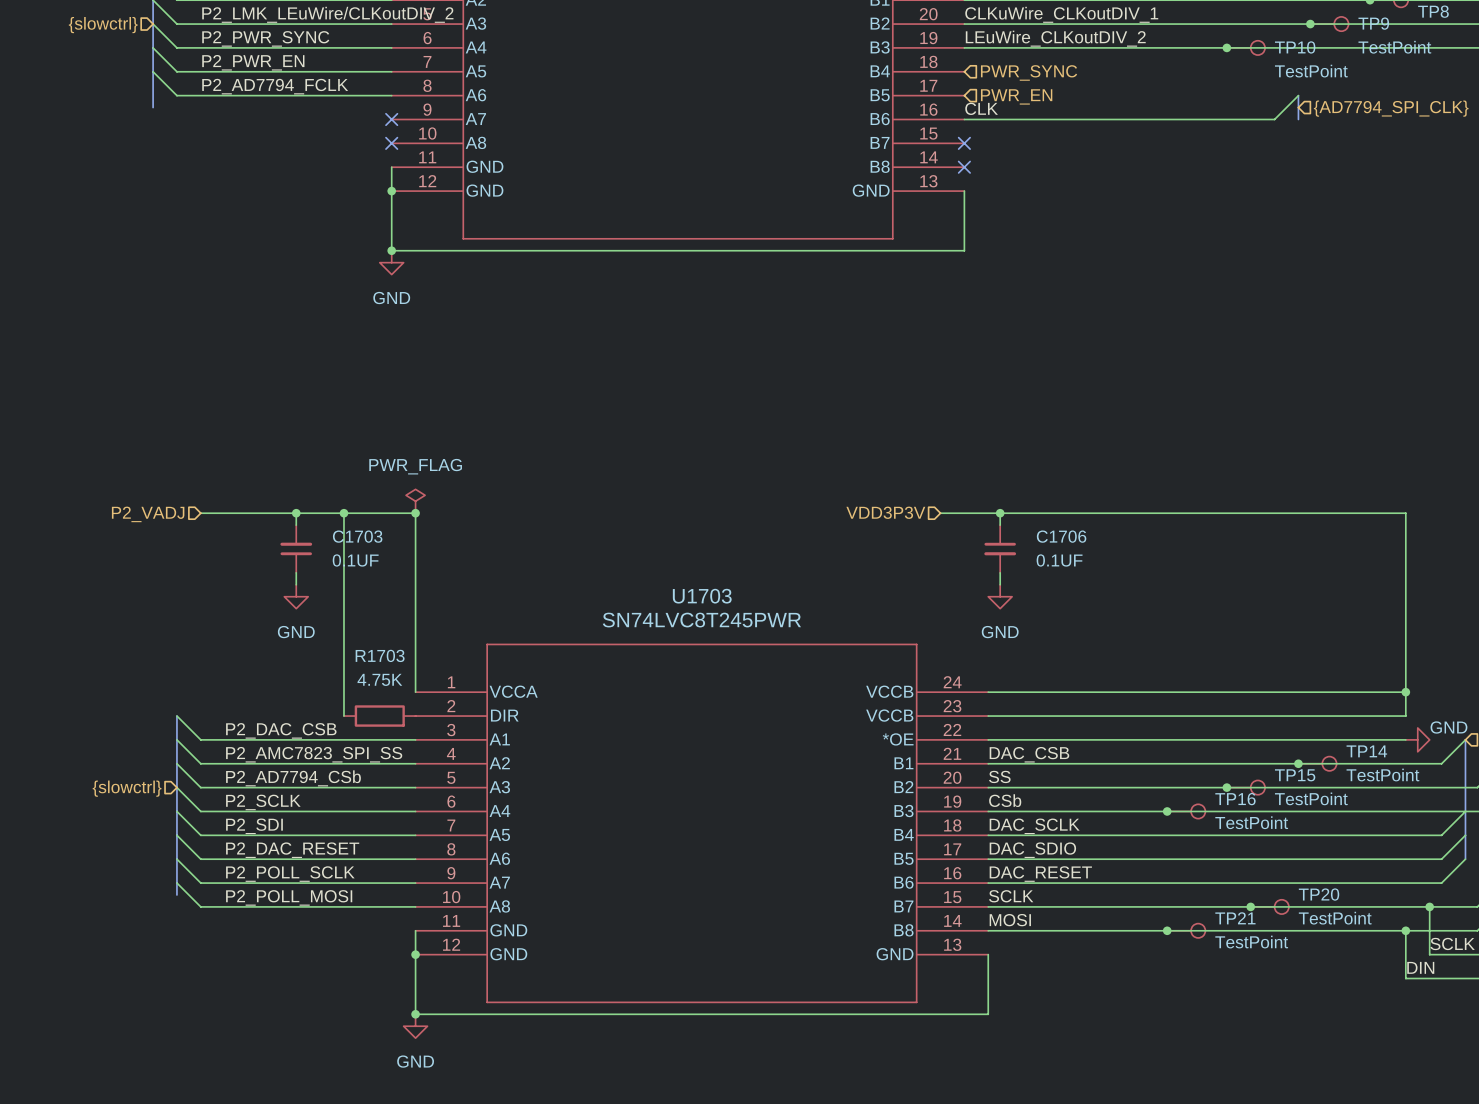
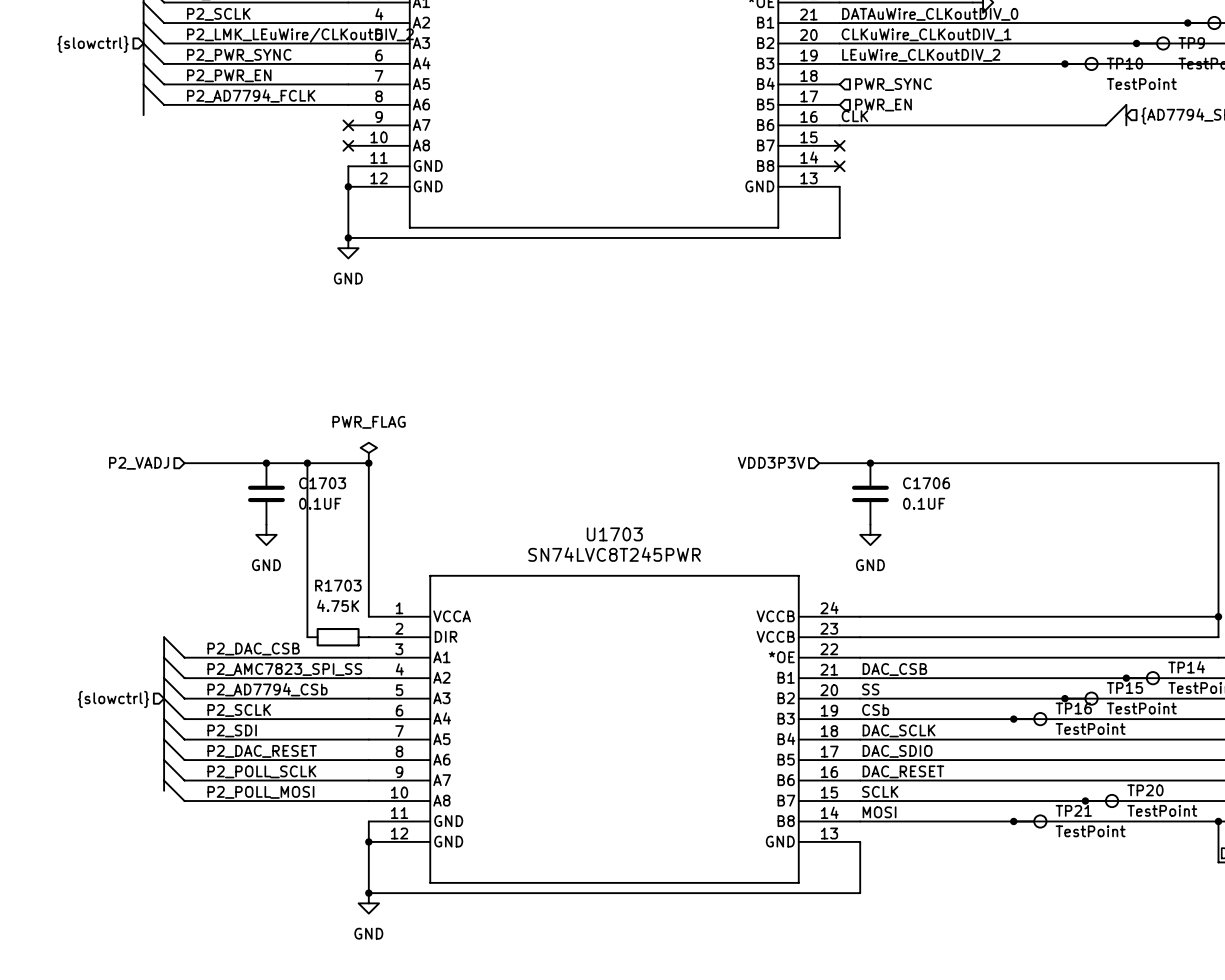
C1703 symbol: [280, 525, 313, 573] -> [248, 463, 285, 525]
C1706 symbol: [984, 525, 1017, 573] -> [852, 463, 889, 525]

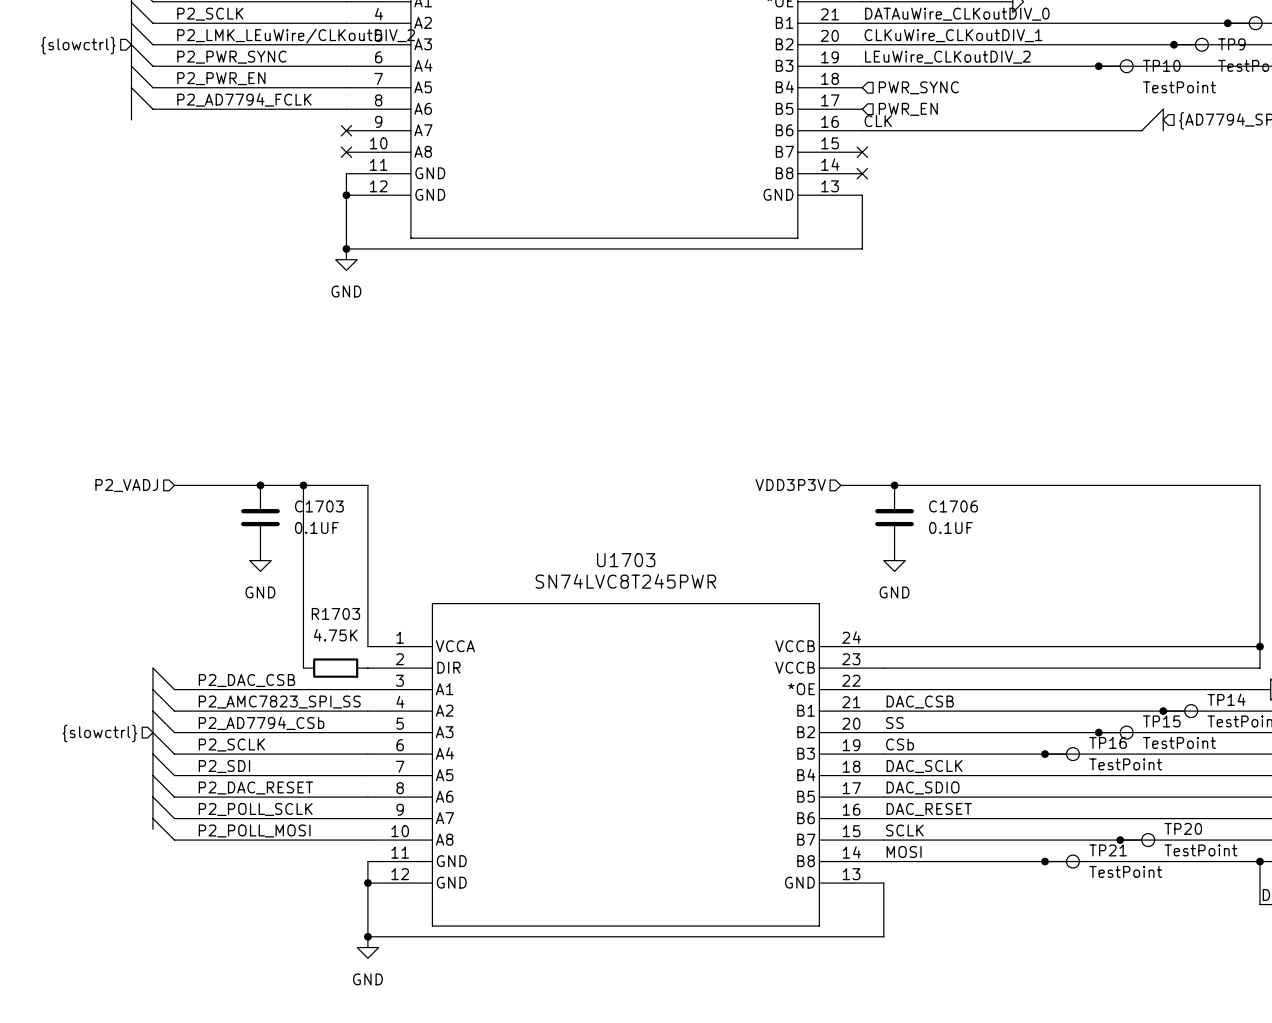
power symbol: PWR_FLAG (368, 452) -> none
junction: (368, 463) -> none

